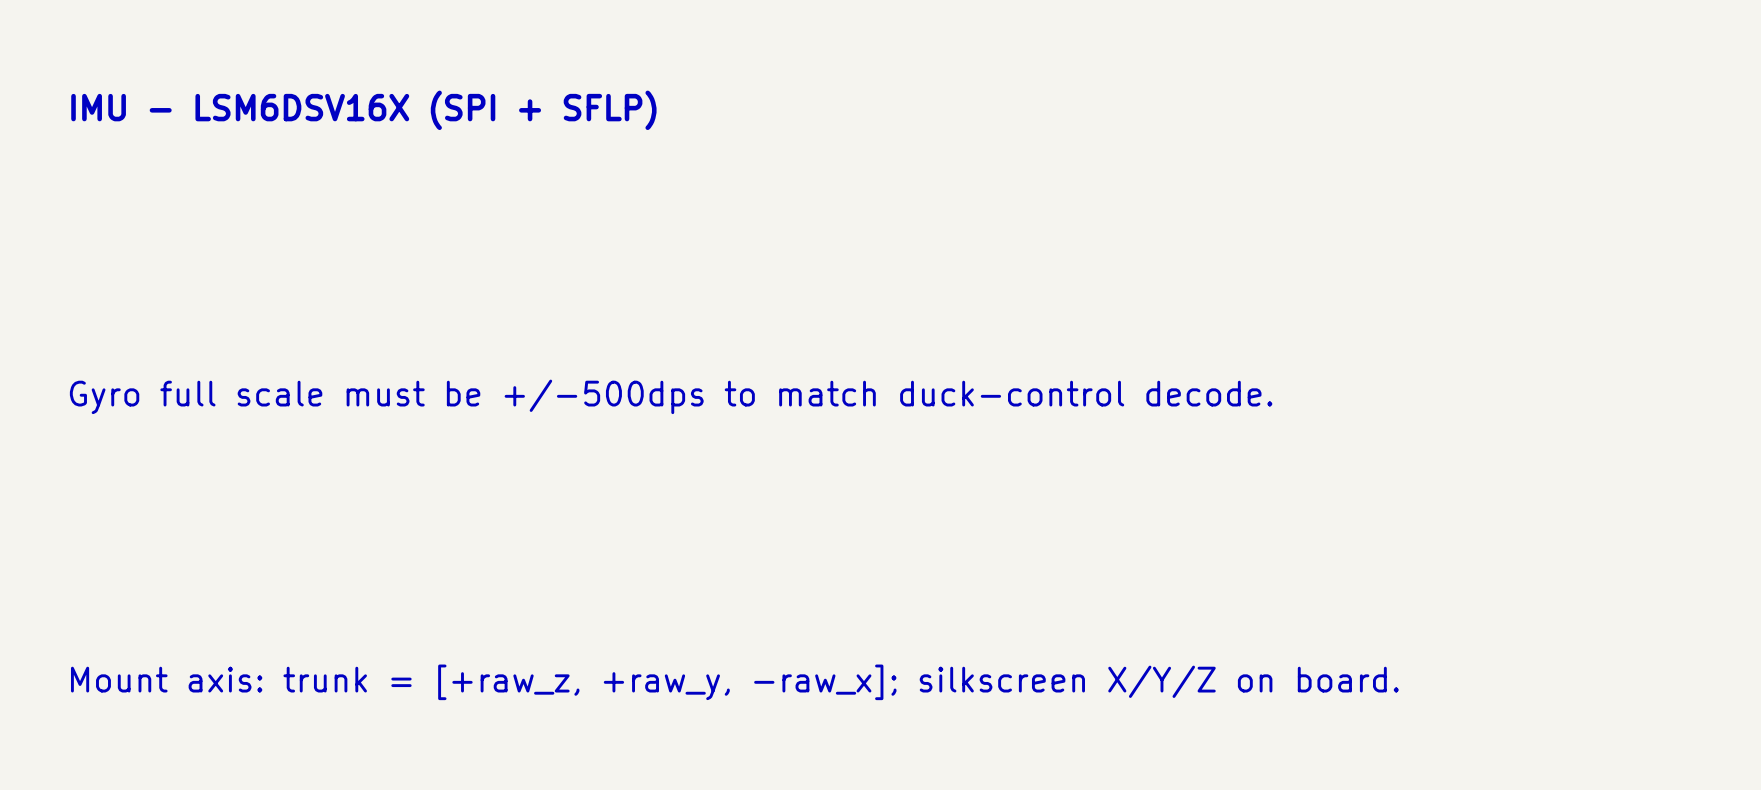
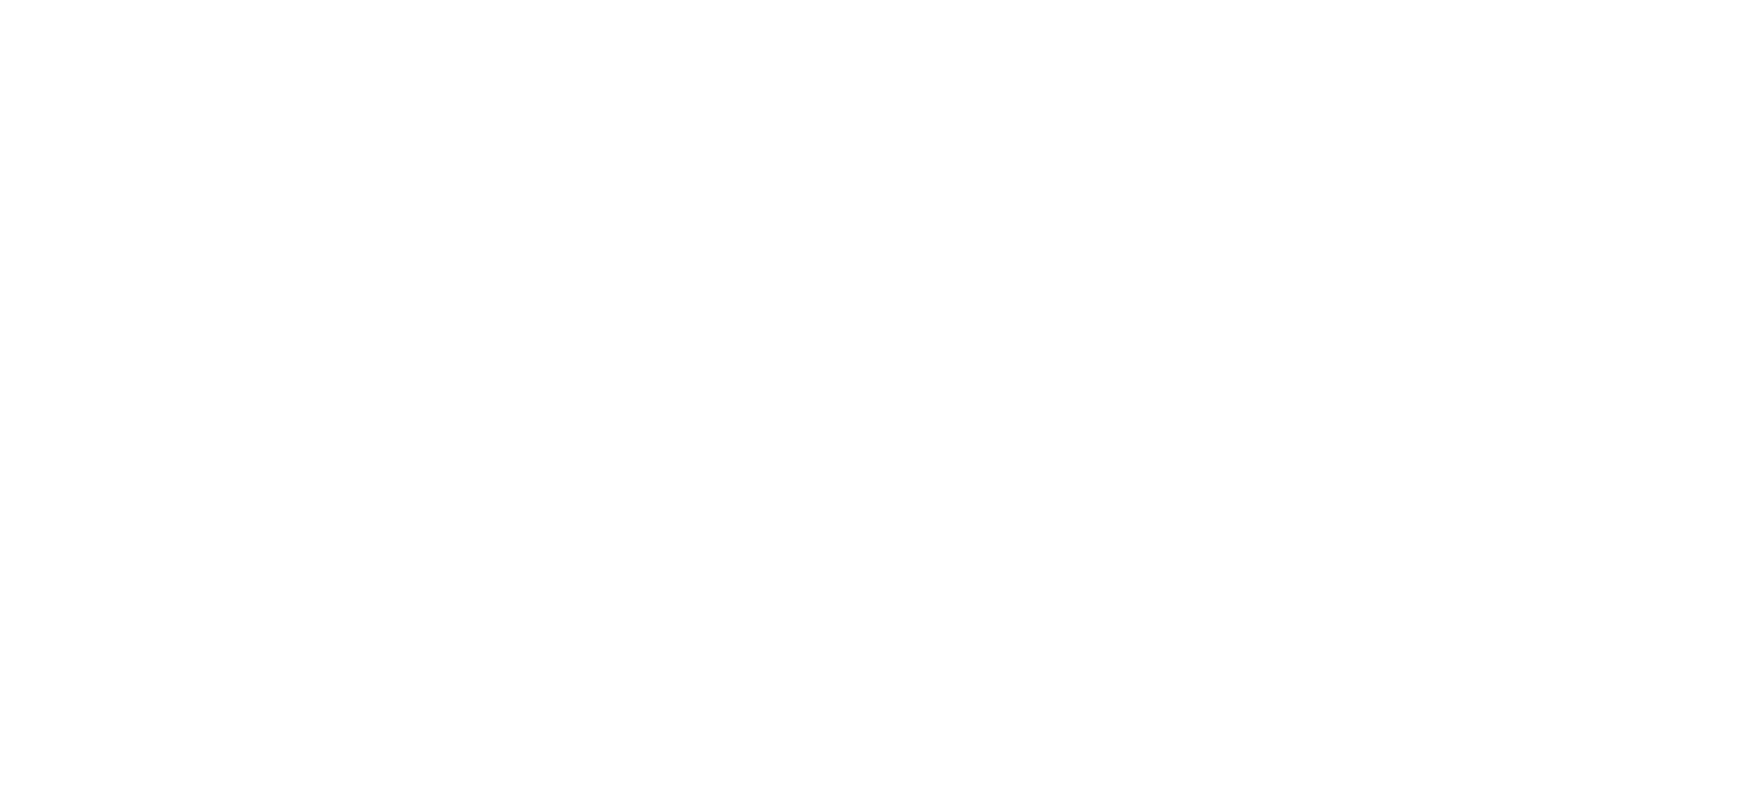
text: IMU - LSM6DSV16X (SPI + SFLP) (363, 110) -> none
text: Gyro full scale must be +/-500dps to match duck-control decode. (671, 396) -> none
text: Mount axis: trunk = [+raw_z, +raw_y, -raw_x]; silkscreen X/Y/Z on board. (734, 682) -> none

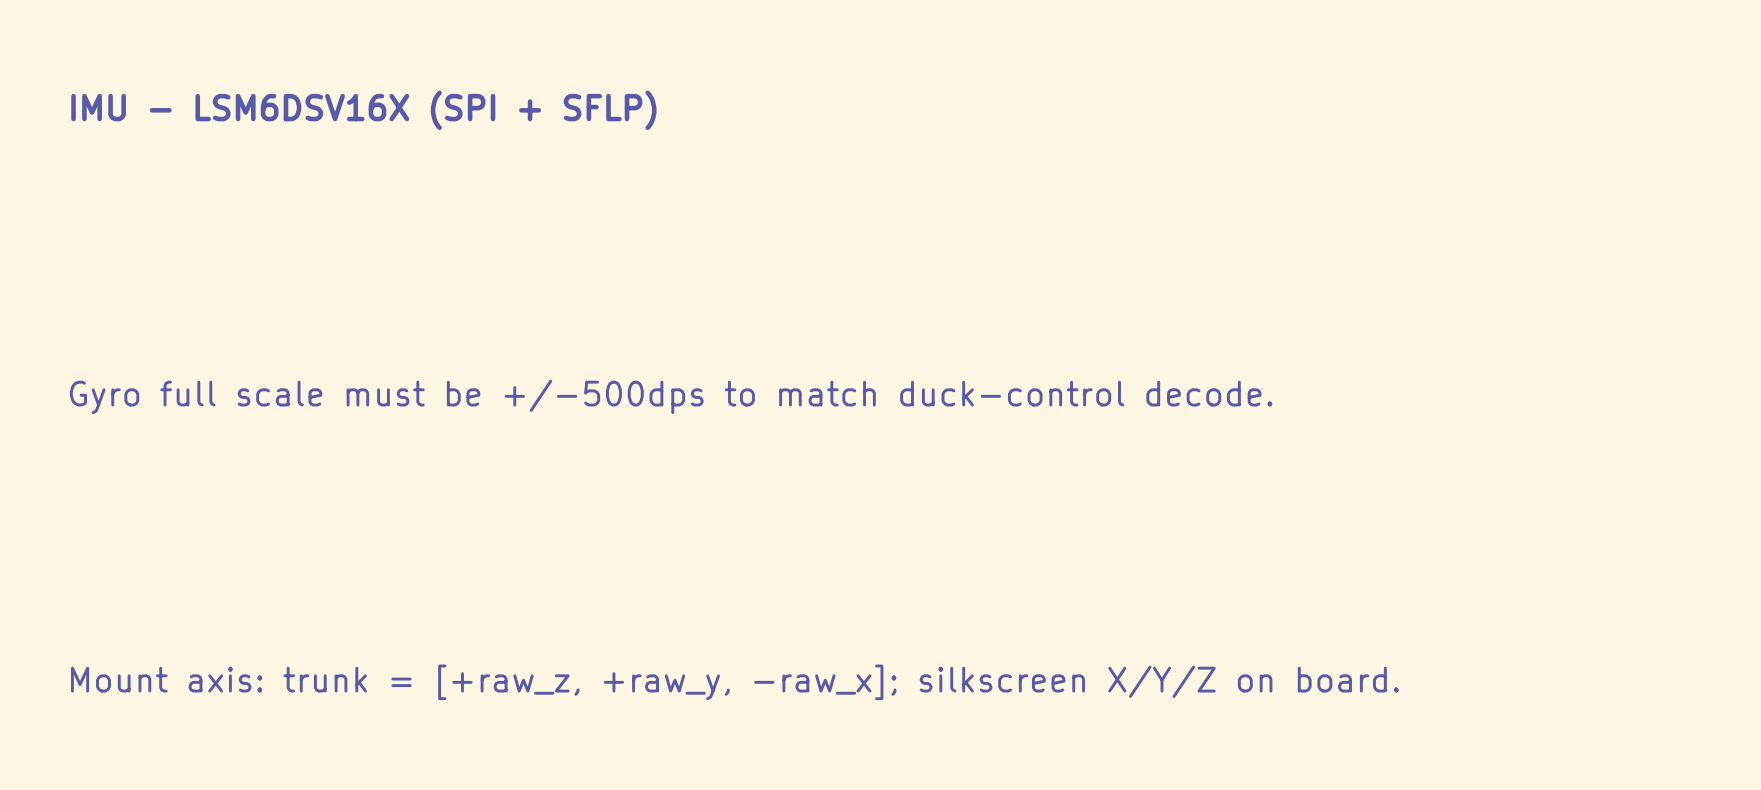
text: none -> IMU - LSM6DSV16X (SPI + SFLP) (363, 110)
text: none -> Gyro full scale must be +/-500dps to match duck-control decode. (671, 396)
text: none -> Mount axis: trunk = [+raw_z, +raw_y, -raw_x]; silkscreen X/Y/Z on board. (734, 682)

